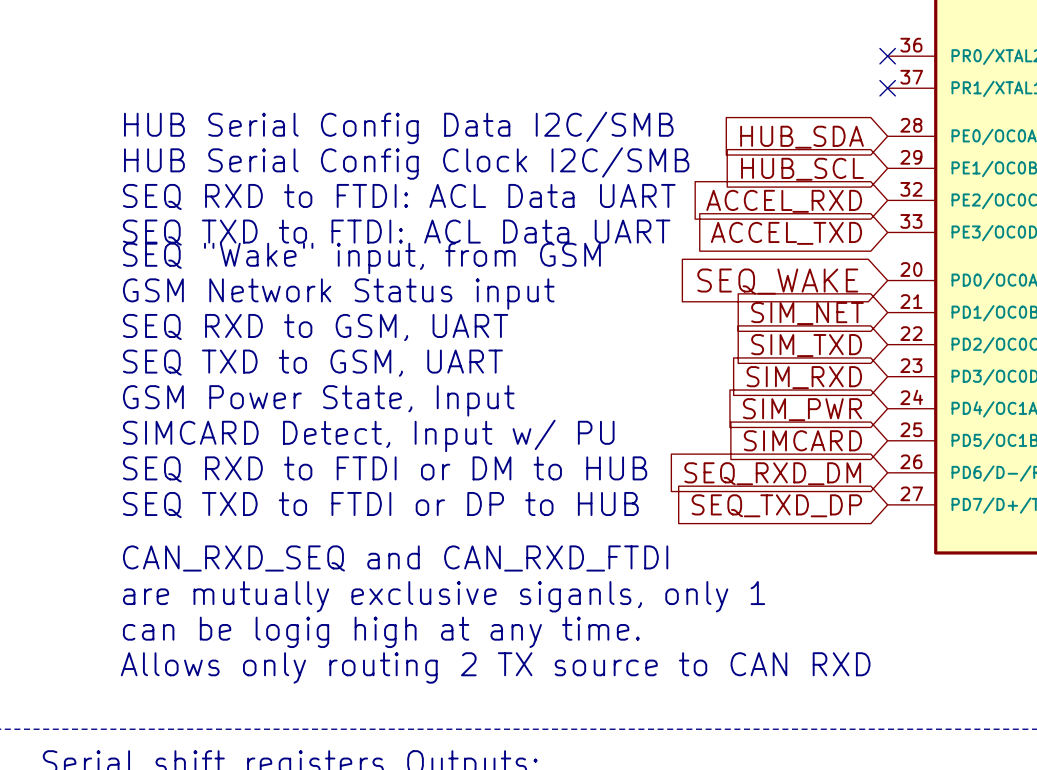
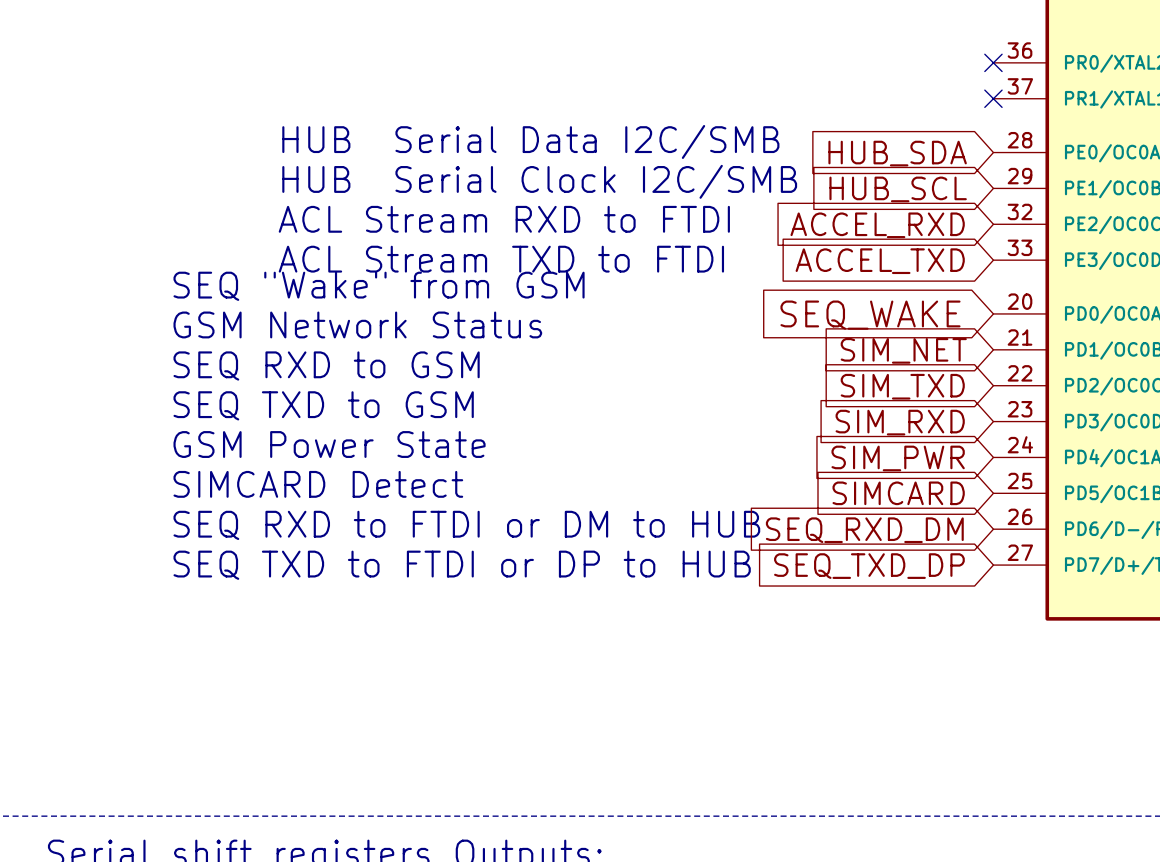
text: none -> HUB Serial Data I2C/SMB (530, 141)
text: HUB Serial Config Data I2C/SMB (398, 127) -> none
text: none -> HUB Serial Clock I2C/SMB (539, 181)
text: HUB Serial Config Clock I2C/SMB (406, 163) -> none
text: none -> ACL Stream RXD to FTDI (504, 219)
text: SEQ RXD to FTDI: ACL Data UART (399, 197) -> none
text: none -> ACL Stream TXD to FTDI (501, 259)
text: SEQ TXD to FTDI: ACL Data UART (396, 232) -> none
text: SEQ "Wake" input, from GSM (361, 258) -> SEQ "Wake" from GSM (379, 286)
text: GSM Network Status input (338, 294) -> GSM Network Status (357, 324)
text: none -> SEQ RXD to GSM (326, 365)
text: SEQ RXD to GSM, UART (315, 327) -> none
text: none -> SEQ TXD to GSM (323, 405)
text: SEQ TXD to GSM, UART (312, 363) -> none
text: GSM Power State, Input (318, 400) -> GSM Power State (329, 444)
text: SIMCARD Detect, Input w/ PU (368, 435) -> SIMCARD Detect (318, 484)
text position: SEQ RXD to FTDI or DM to HUB (385, 469) -> SEQ RXD to FTDI or DM to HUB (466, 525)
text position: SEQ TXD to FTDI or DP to HUB (380, 505) -> SEQ TXD to FTDI or DP to HUB (462, 565)
text: CAN_RXD_SEQ and CAN_RXD_FTDI (395, 558) -> none
text: are mutually exclusive siganls, only 1 (444, 596) -> none
text: can be logig high at any time. (381, 632) -> none
text: Allows only routing 2 TX source to CAN RXD (495, 667) -> none

